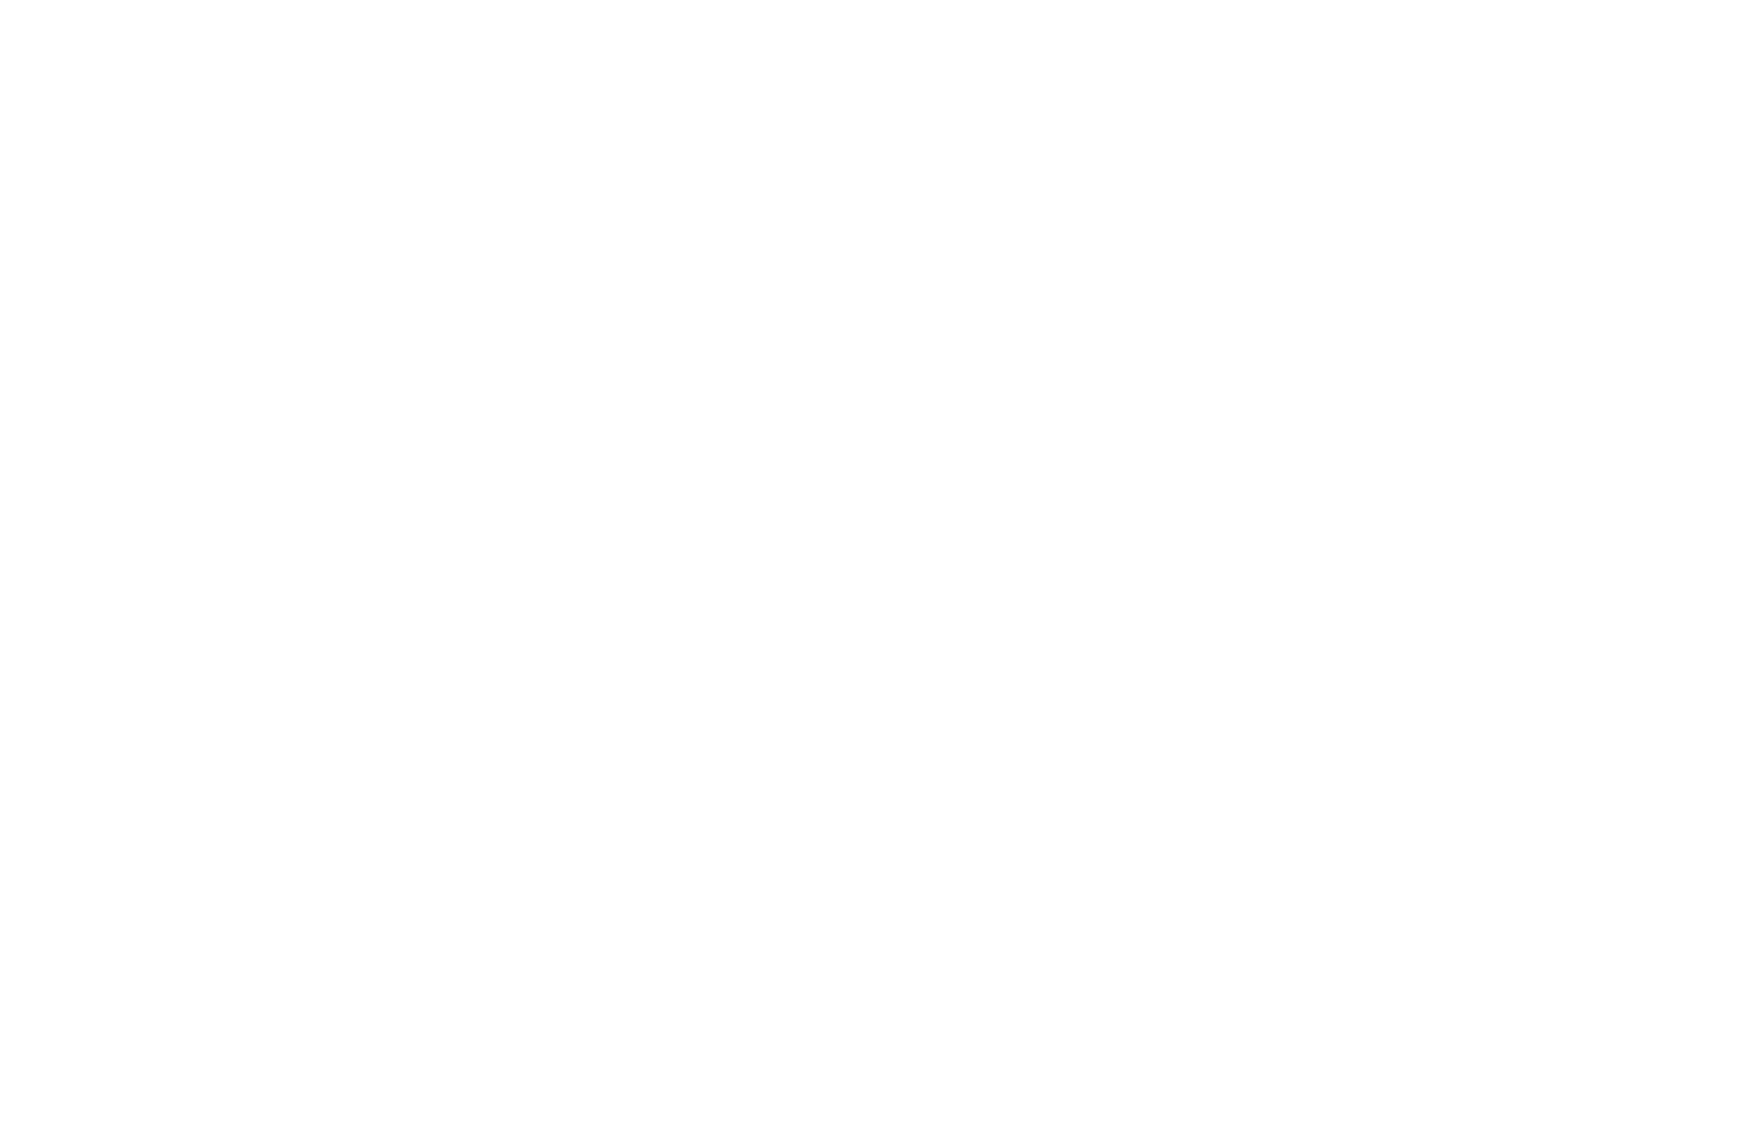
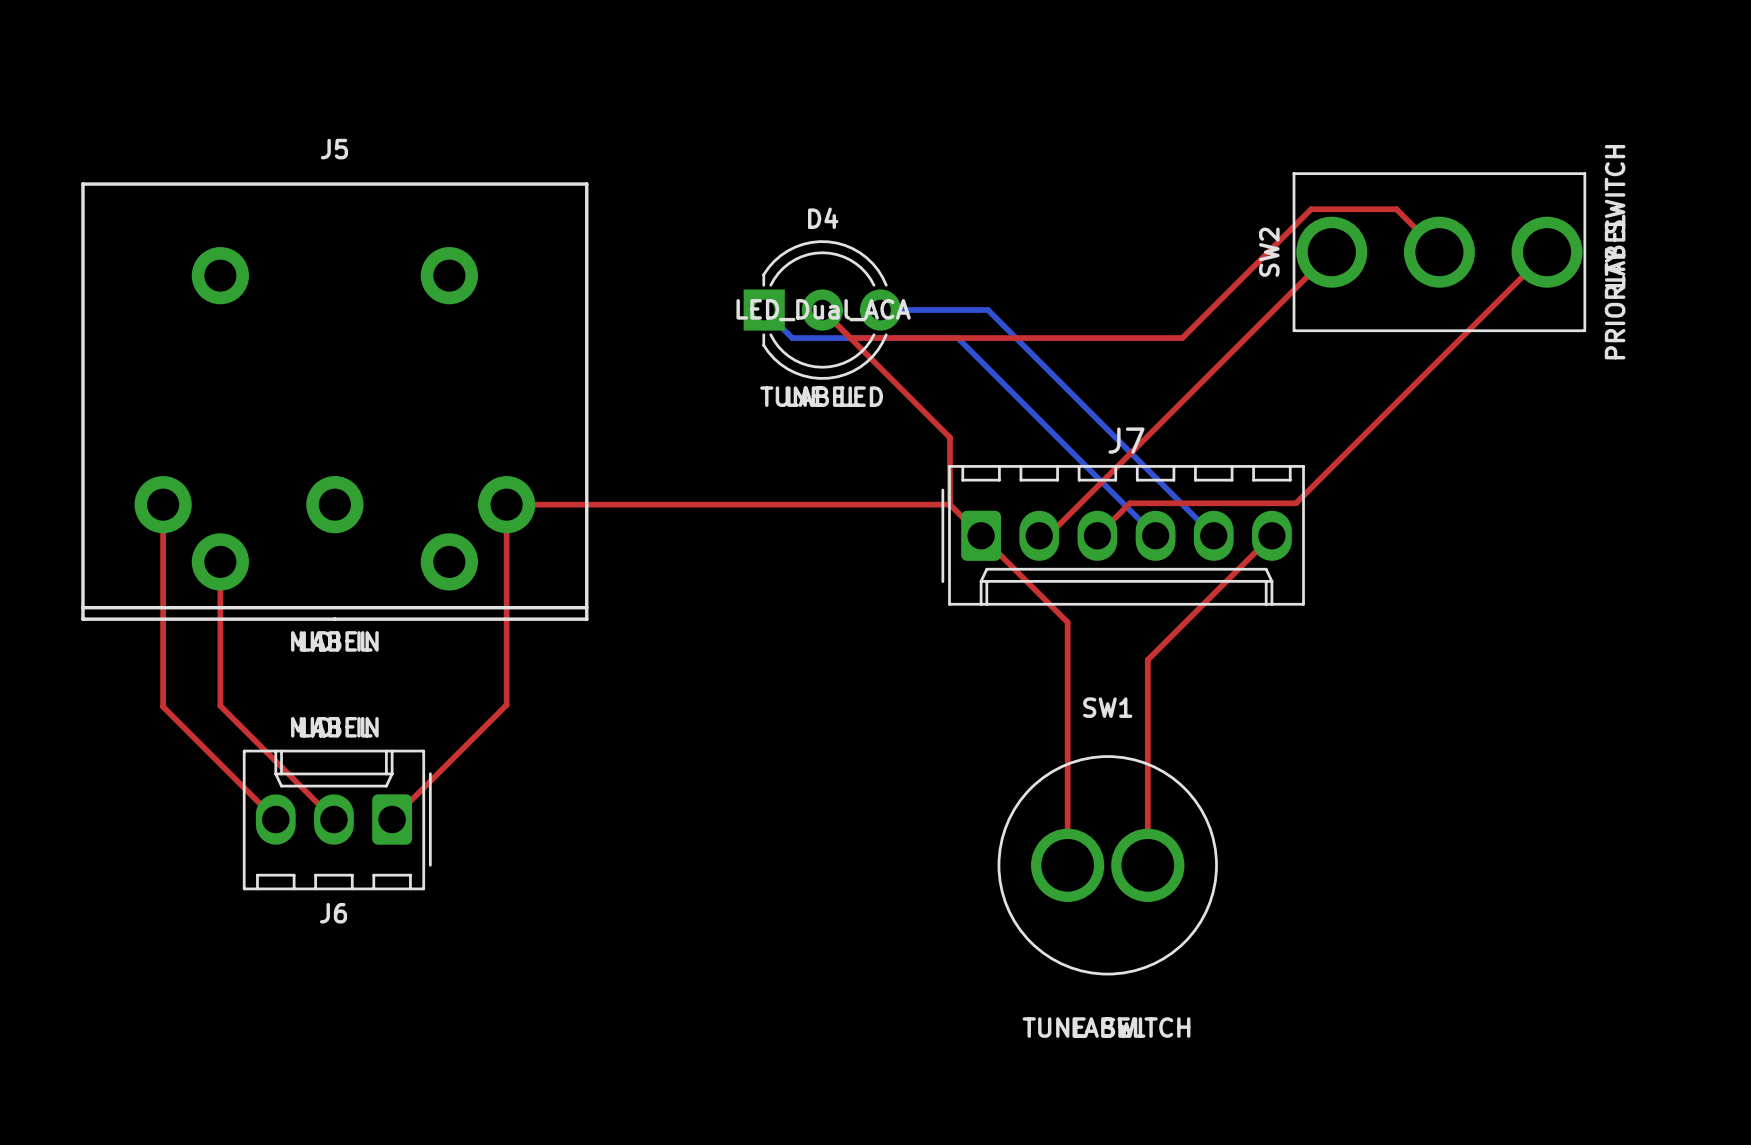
top track: none -> (1331, 252) (1048, 535) (1039, 535)
top track: none -> (1439, 252) (1396, 209) (1311, 209) (1182, 338) (850, 338)
SW2: none -> (1439, 252)
top track: none -> (1547, 252) (1295, 503) (1129, 503) (1097, 535)
bottom track: none -> (764, 310) (792, 338) (957, 338) (1155, 535)
top track: none -> (822, 310) (949, 437) (949, 504)
D4: none -> LED_Dual_ACA (822, 310)
bottom track: none -> (880, 310) (987, 310) (1213, 535)
J5: none -> (334, 401)
top track: none -> (163, 504) (163, 706) (275, 819)
top track: none -> (949, 504) (1067, 622) (1067, 865)
top track: none -> (949, 504) (506, 504) (506, 705) (392, 819)
J7: none -> (1123, 535)
top track: none -> (1271, 535) (1147, 659) (1147, 865)
top track: none -> (220, 561) (220, 705) (333, 819)
J6: none -> (337, 819)
SW1: none -> (1107, 865)

